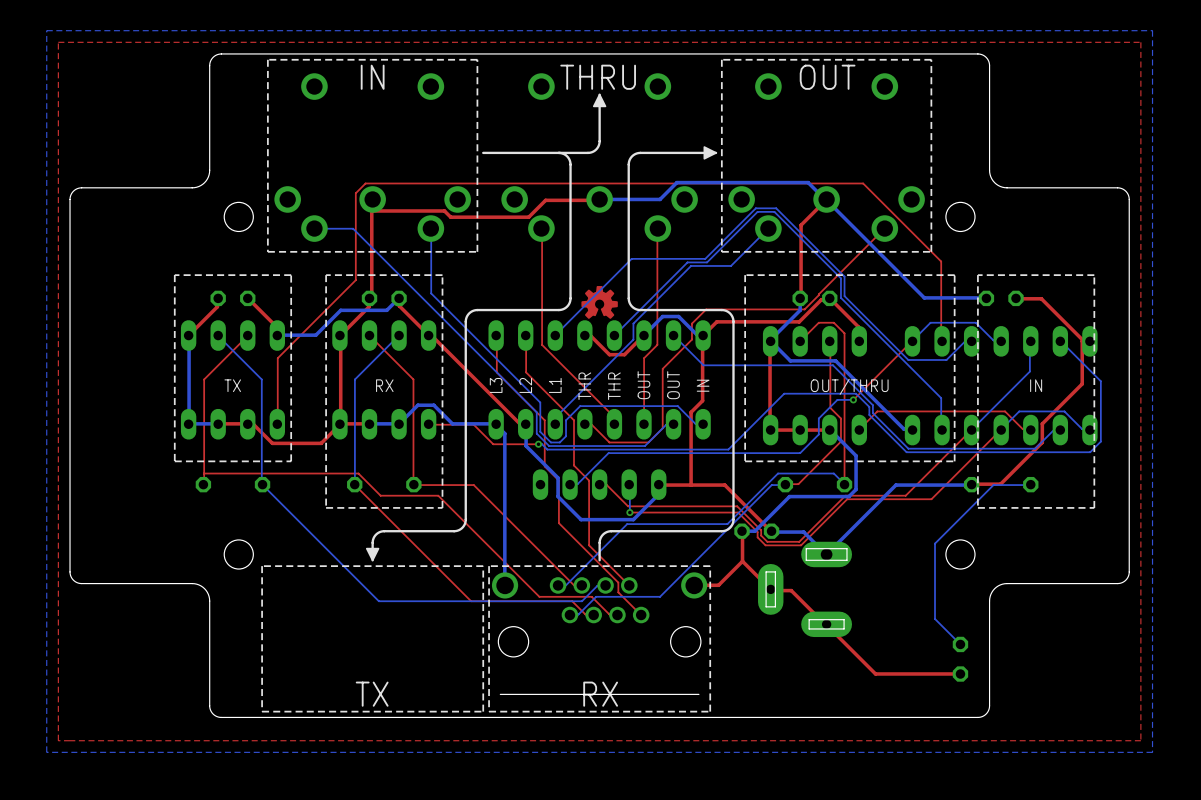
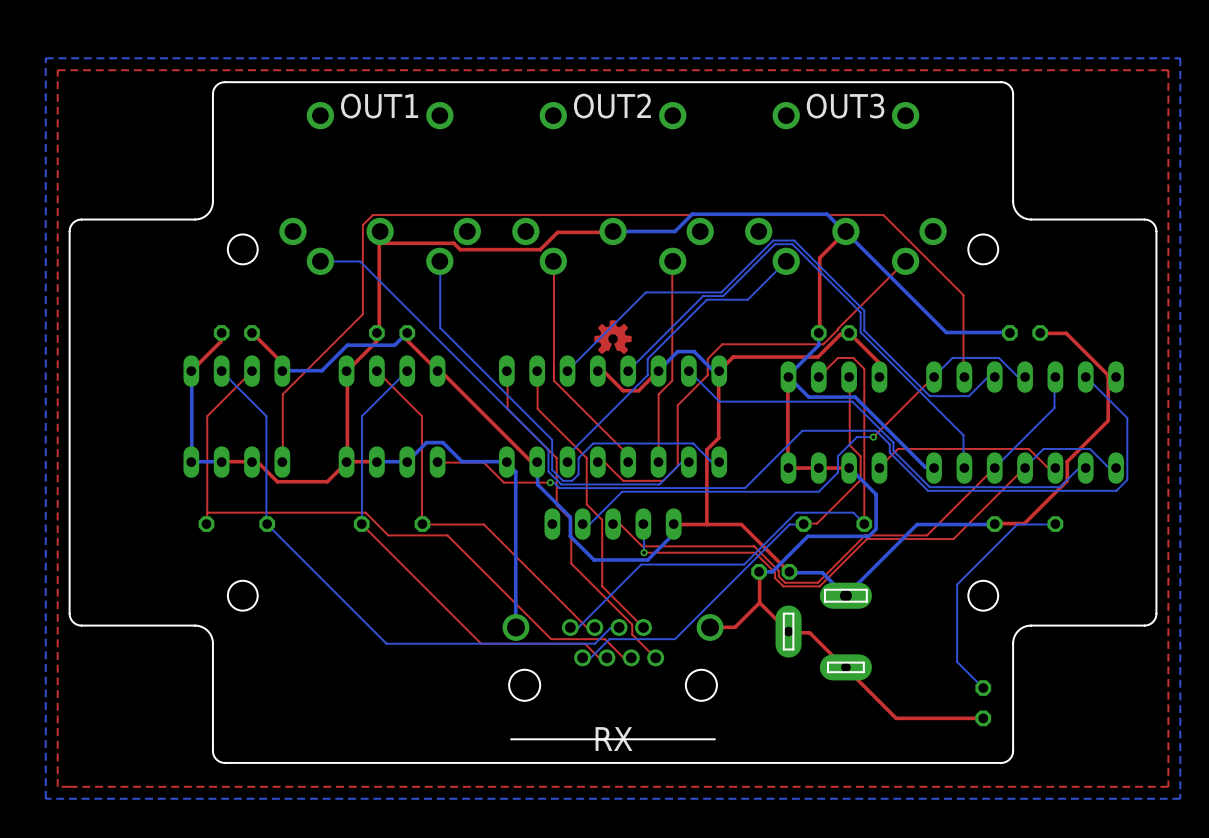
line: (477, 59) (267, 59) (267, 251) (477, 251) (477, 59) -> none
line: (931, 59) (721, 59) (721, 251) (931, 251) (931, 59) -> none
text: IN (372, 77) -> OUT1 (379, 106)
text: THRU (598, 77) -> OUT2 (612, 106)
text: OUT (827, 77) -> OUT3 (845, 106)
drawing: [592, 93, 607, 108] -> none
line: (599, 94) (599, 142) (593, 151) (483, 152) -> none
drawing: [703, 146, 717, 160] -> none
line: (558, 152) (565, 155) (570, 163) (569, 302) (565, 307) (560, 309) (477, 310) (468, 314) (465, 321) (464, 524) (461, 528) (455, 531) (379, 532) (373, 539) (372, 560) -> none
line: (716, 152) (638, 153) (630, 158) (628, 298) (631, 305) (638, 309) (723, 310) (728, 312) (732, 317) (733, 522) (728, 528) (723, 531) (608, 531) (603, 534) (600, 539) (599, 560) -> none
line: (291, 275) (174, 275) (174, 461) (291, 461) (291, 275) -> none
line: (442, 275) (326, 275) (326, 507) (442, 507) (442, 275) -> none
line: (954, 275) (745, 275) (745, 461) (954, 461) (954, 275) -> none
line: (1094, 275) (977, 275) (977, 507) (1094, 507) (1094, 275) -> none
text: TX (232, 385) -> none
text: RX (384, 385) -> none
text: L3 (496, 385) -> none
text: L2 (525, 385) -> none
text: L1 (555, 385) -> none
text: OUT (643, 385) -> none
text: OUT (673, 385) -> none
text: IN (703, 385) -> none
text: IN (1036, 385) -> none
text: THR (584, 386) -> none
text: THR (614, 386) -> none
text: OUT/THRU (849, 386) -> none
drawing: [365, 547, 380, 562] -> none
line: (483, 566) (262, 566) (262, 711) (483, 711) (483, 566) -> none
line: (710, 566) (489, 566) (489, 711) (710, 711) (710, 566) -> none
text: TX (372, 694) -> none

